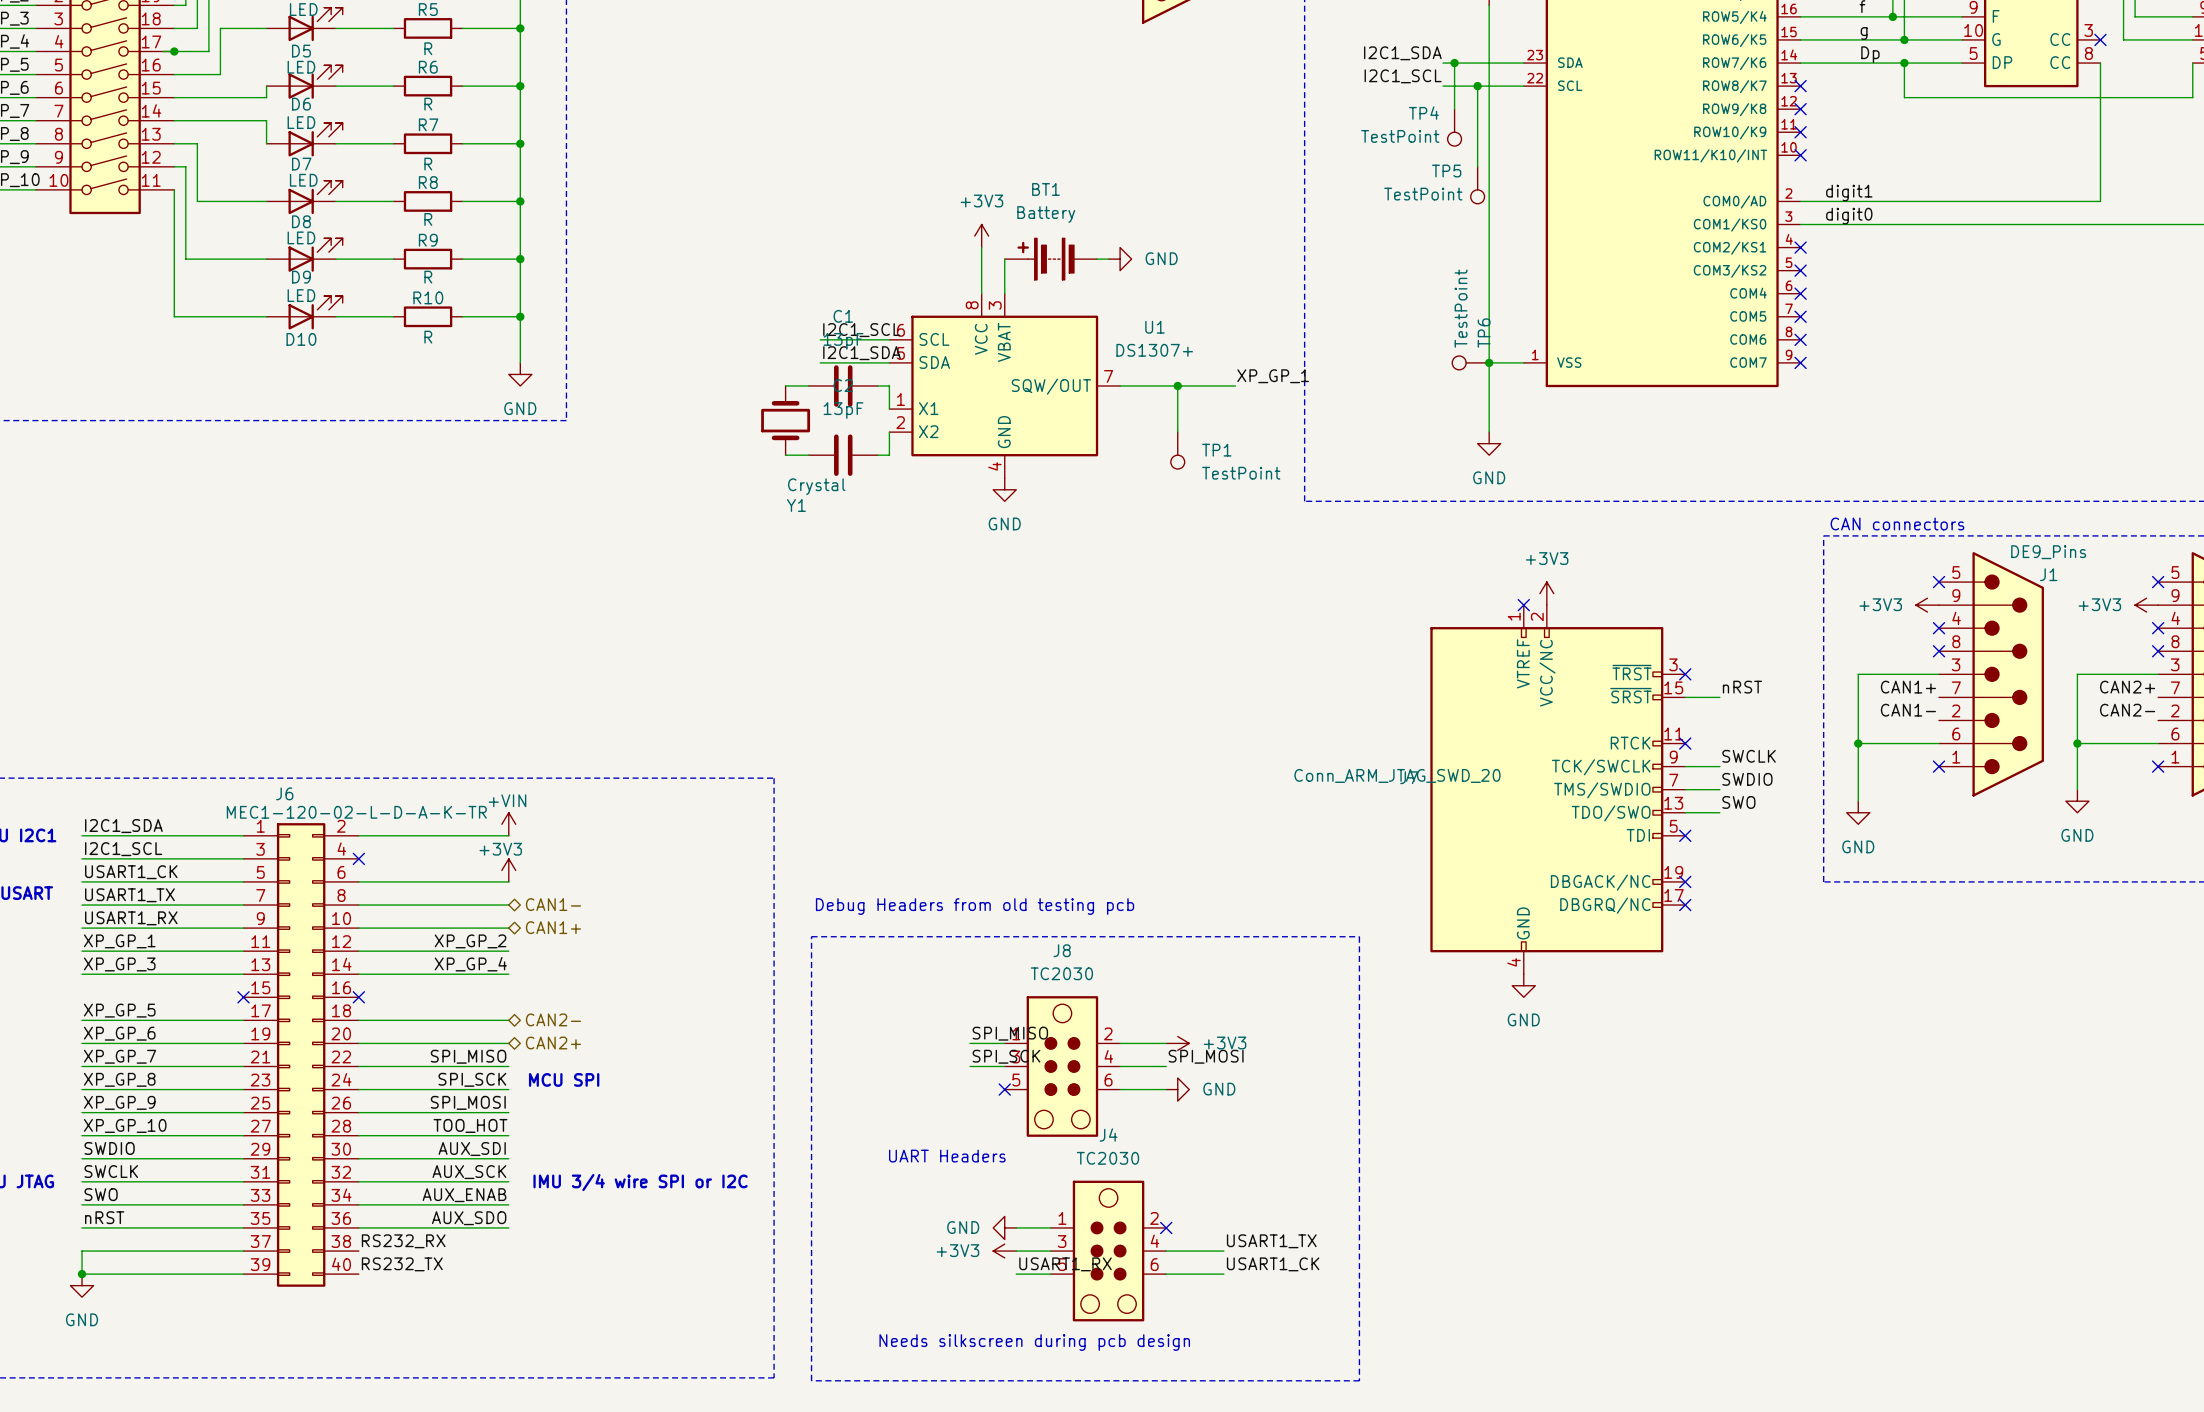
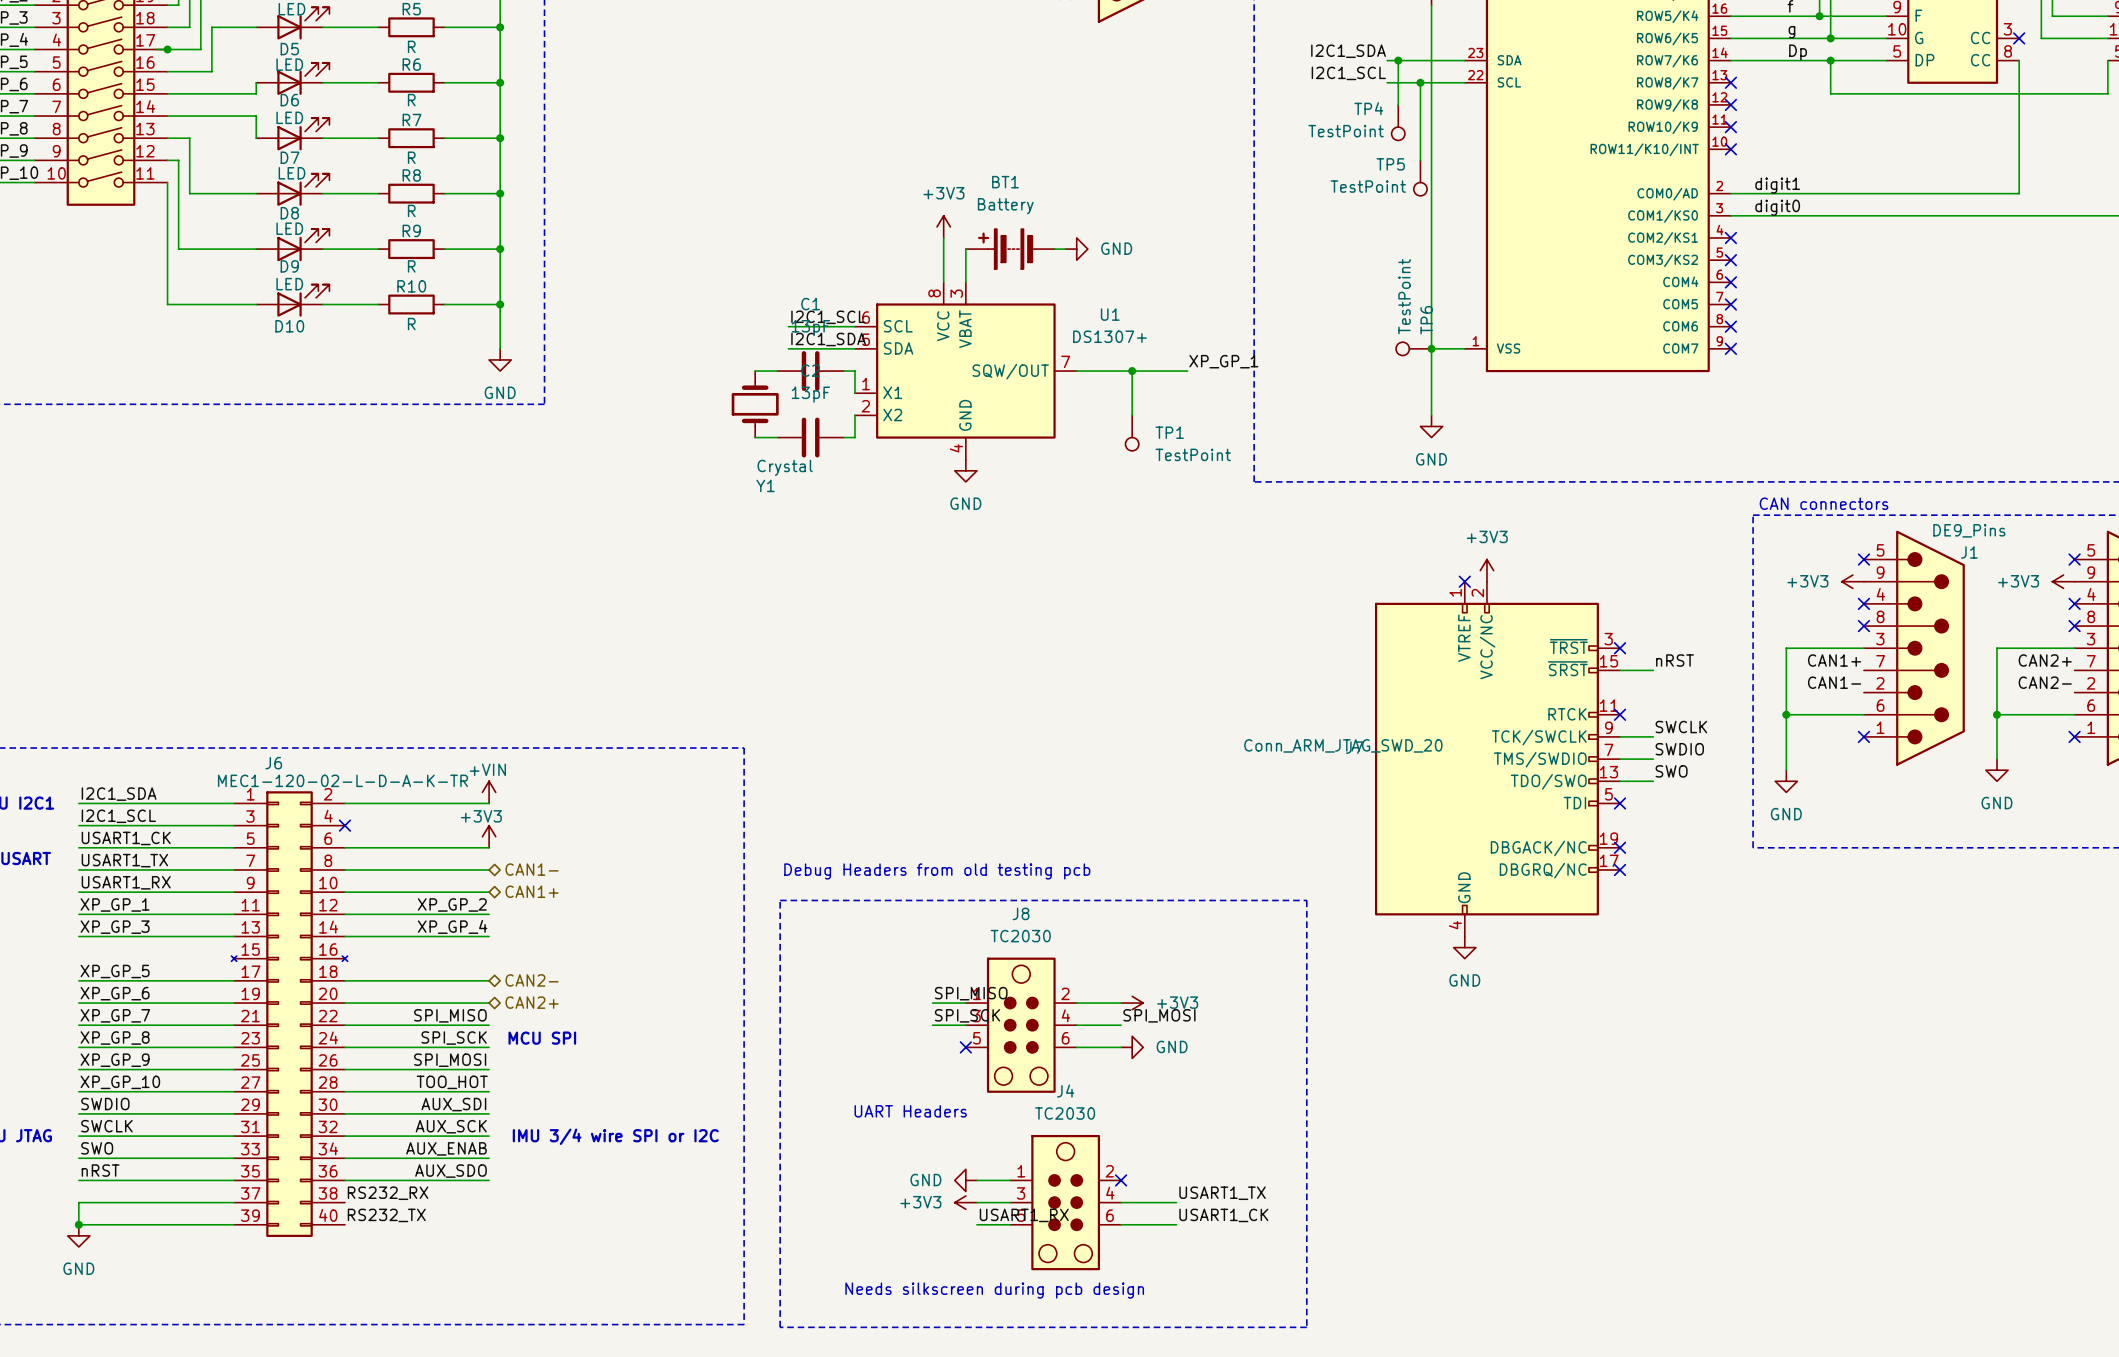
J6 symbol: [243, 823, 359, 1287] -> [231, 791, 348, 1237]
no-connect mark: (243, 997) -> none
no-connect mark: (358, 997) -> none

